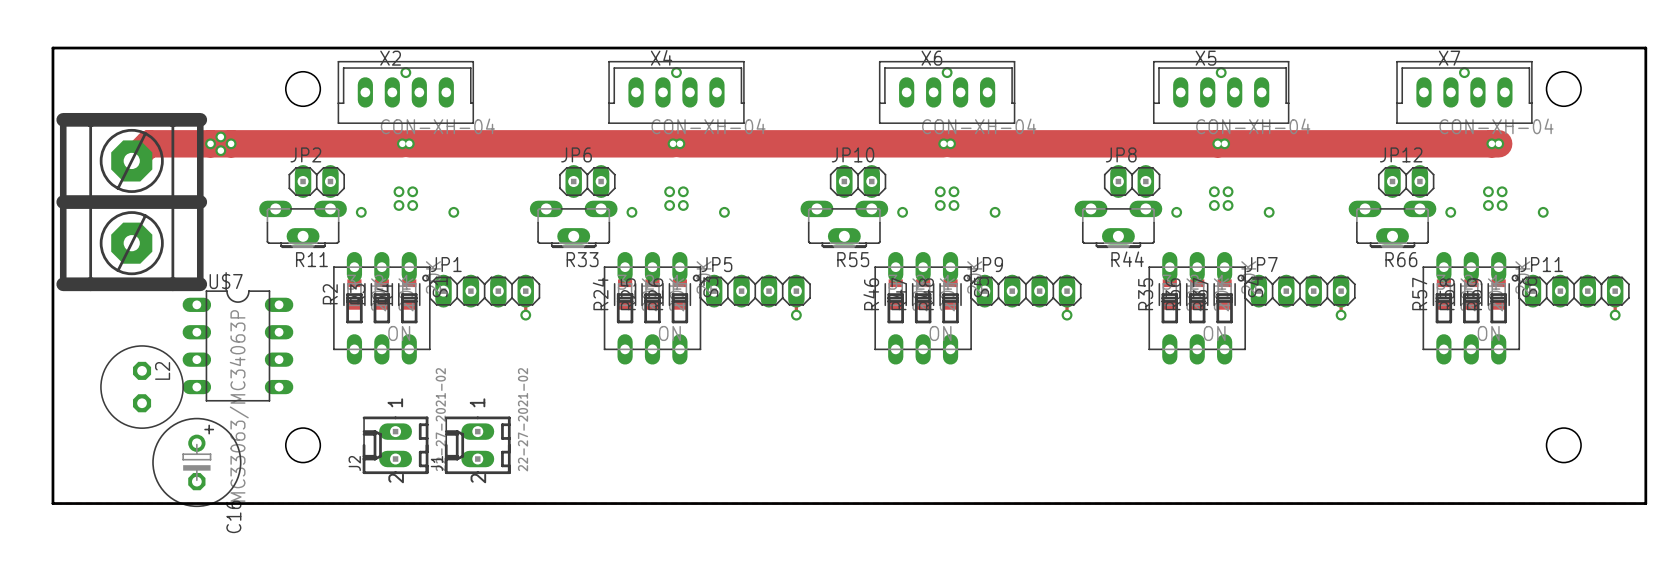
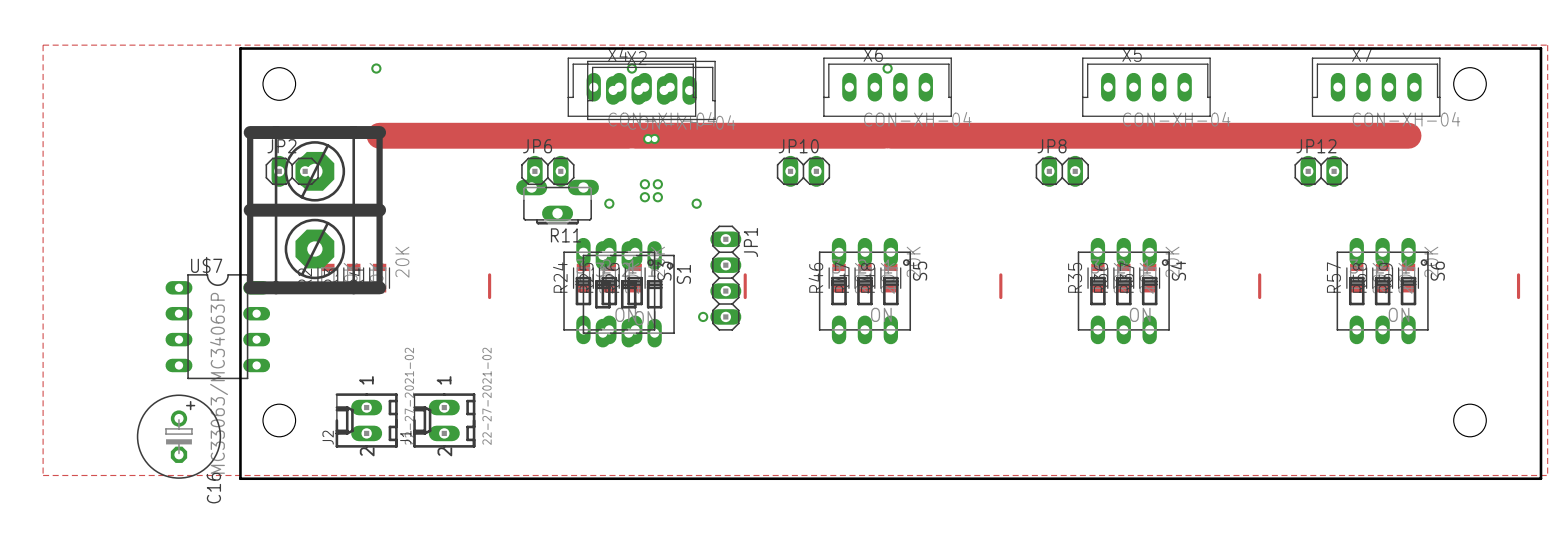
board edge: (52, 48) (52, 503) (1645, 503) (1645, 48) (52, 48) -> (240, 48) (240, 478) (1540, 478) (1540, 48) (240, 48)
via: (1221, 72) -> none
via: (1464, 72) -> none
X2 position: (405, 92) -> (651, 90)
via: (220, 136) -> none
via: (210, 143) -> none
via: (231, 143) -> none
track: (402, 143) (148, 143) (131, 160) -> none
via: (402, 143) -> none
via: (409, 143) -> none
via: (673, 143) -> none
via: (679, 143) -> none
via: (943, 143) -> none
via: (950, 143) -> none
via: (1217, 143) -> none
via: (1224, 143) -> none
via: (1491, 143) -> none
via: (1498, 143) -> none
via: none -> (648, 138)
via: none -> (654, 138)
via: (220, 150) -> none
via: (398, 191) -> none
via: (412, 191) -> none
via: (669, 191) -> none
via: (683, 191) -> none
via: (940, 191) -> none
via: (953, 191) -> none
via: (1214, 191) -> none
via: (1228, 191) -> none
via: (1488, 191) -> none
via: (1502, 191) -> none
via: none -> (644, 184)
via: none -> (657, 184)
part: (131, 202) -> none
via: (398, 205) -> none
via: (412, 205) -> none
via: (669, 205) -> none
via: (683, 205) -> none
via: (940, 205) -> none
via: (953, 205) -> none
via: (1214, 205) -> none
via: (1228, 205) -> none
via: (1488, 205) -> none
via: (1502, 205) -> none
via: none -> (644, 197)
via: none -> (657, 197)
via: (361, 212) -> none
via: (453, 212) -> none
via: (631, 212) -> none
via: (724, 212) -> none
via: (902, 212) -> none
via: (995, 212) -> none
via: (1176, 212) -> none
via: (1269, 212) -> none
via: (1450, 212) -> none
via: (1543, 212) -> none
via: none -> (609, 203)
via: none -> (696, 203)
part: none -> (314, 210)
R11 position: (303, 224) -> (557, 202)
R33: (573, 224) -> none
R55: (844, 224) -> none
R44: (1118, 224) -> none
R66: (1392, 224) -> none
JP1 rotation: 0° (484, 291) -> 90° clockwise (725, 278)
JP1 position: (484, 291) -> (725, 278)
JP5: (755, 291) -> none
JP9: (1025, 291) -> none
JP7: (1300, 291) -> none
JP11: (1574, 291) -> none
S1 position: (381, 308) -> (628, 294)
via: (525, 315) -> none
via position: (796, 315) -> (703, 316)
via: (1067, 315) -> none
via: (1341, 315) -> none
via: (1615, 315) -> none
L2: (142, 387) -> none

